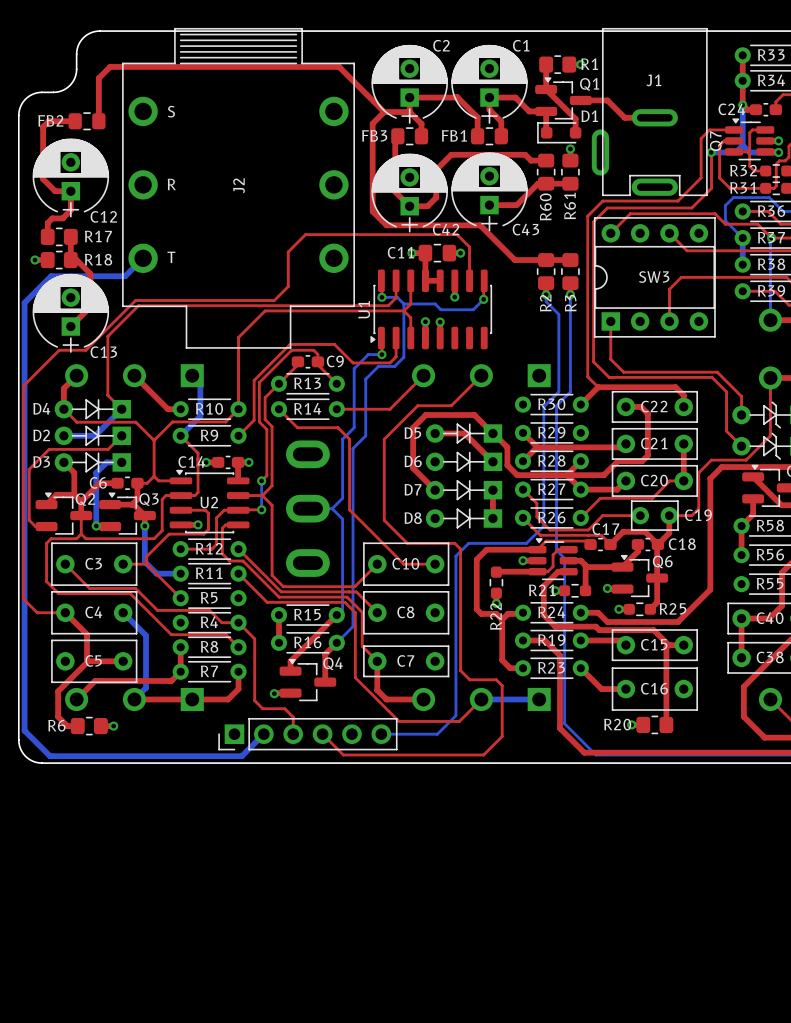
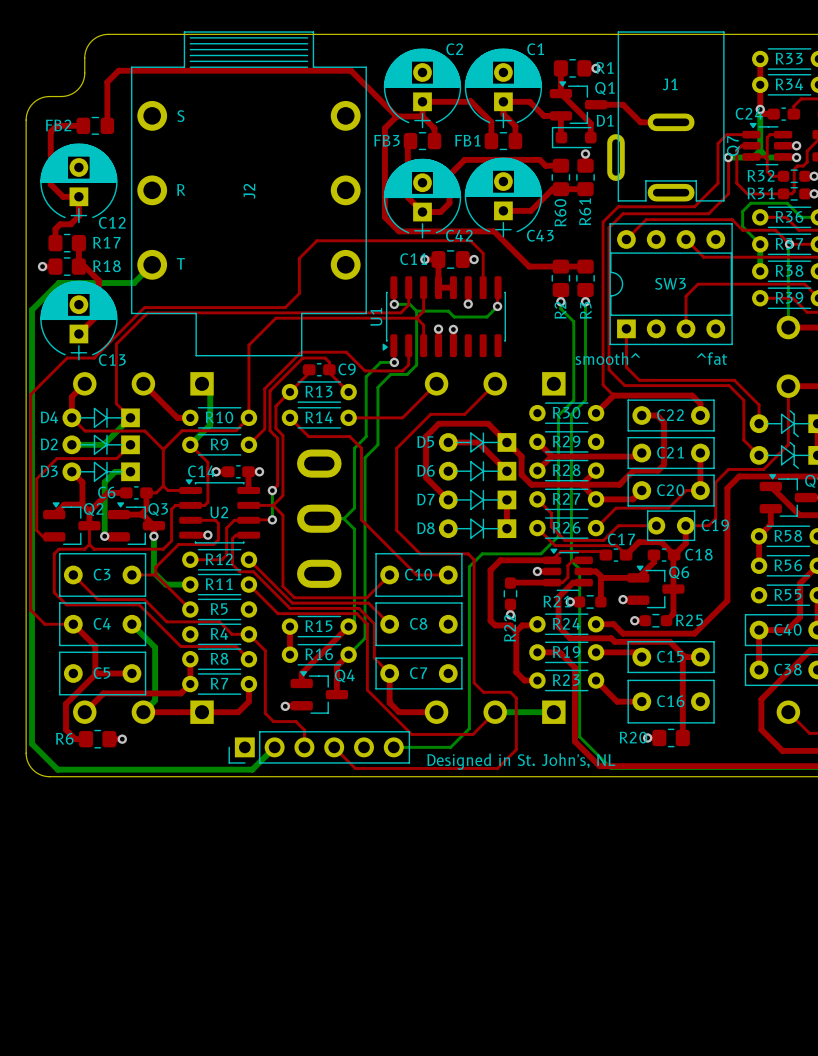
text: none -> smooth^ (607, 358)
text: none -> ^fat (711, 358)
text: none -> Designed in St. John's, NL (521, 761)

